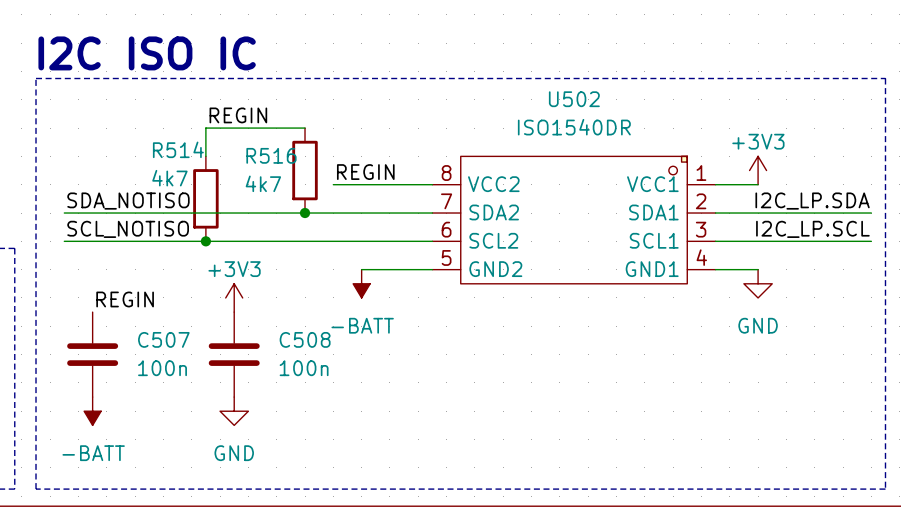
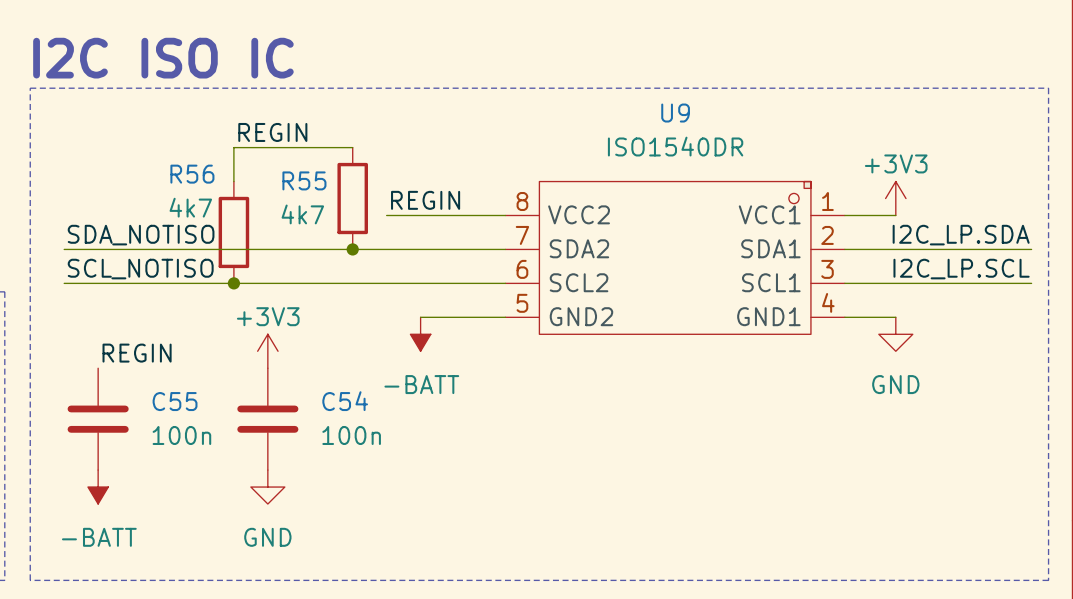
U502 name: U502 (574, 99) -> U9 (675, 113)
R514 name: R514 (178, 149) -> R56 (192, 174)
R516 name: R516 (271, 155) -> R55 (304, 180)
C507 name: C507 (163, 339) -> C55 (175, 401)
C508 name: C508 (305, 339) -> C54 (345, 401)

